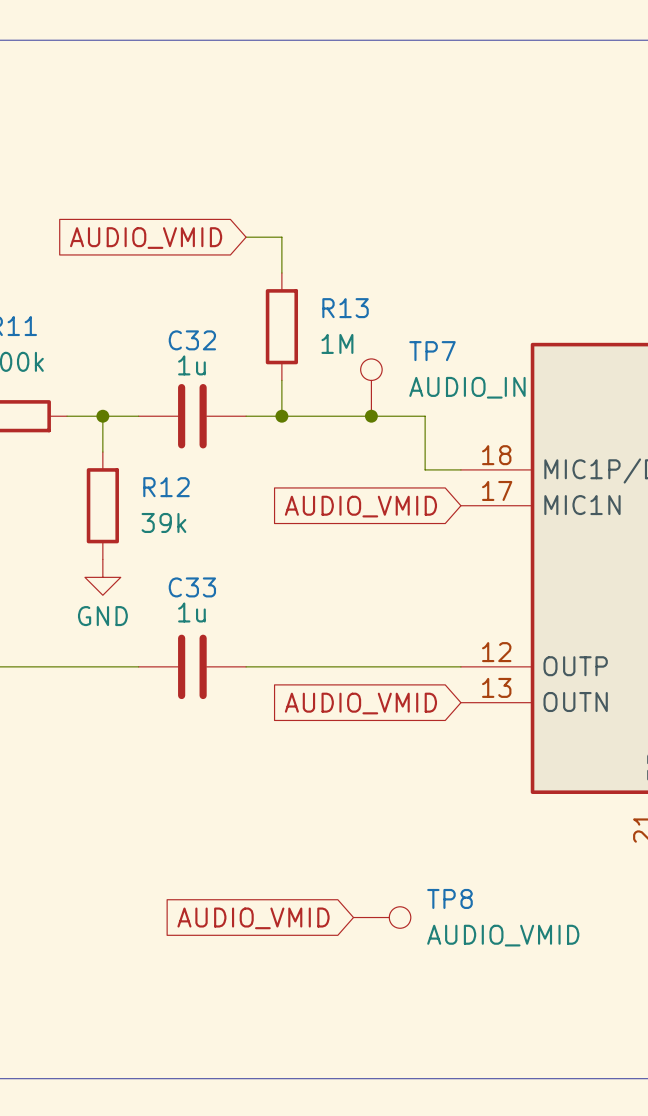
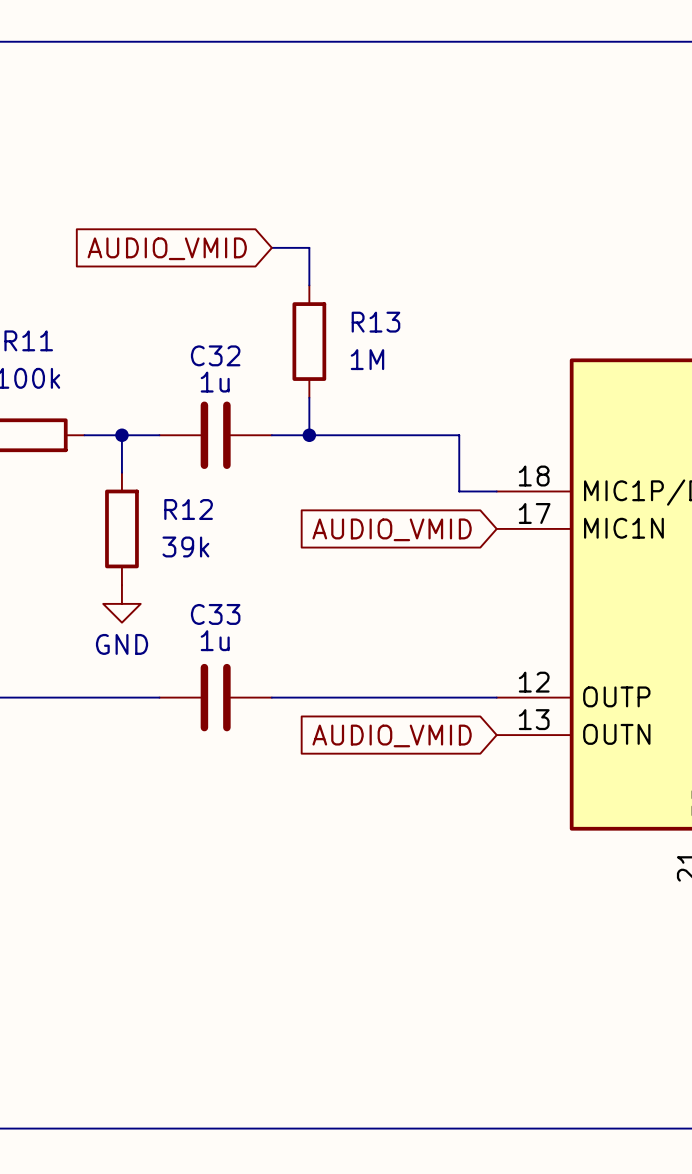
TP7: AUDIO_IN (371, 387) -> none
junction: (371, 416) -> none
TP8: AUDIO_VMID (382, 917) -> none
global label: AUDIO_VMID (253, 918) -> none

